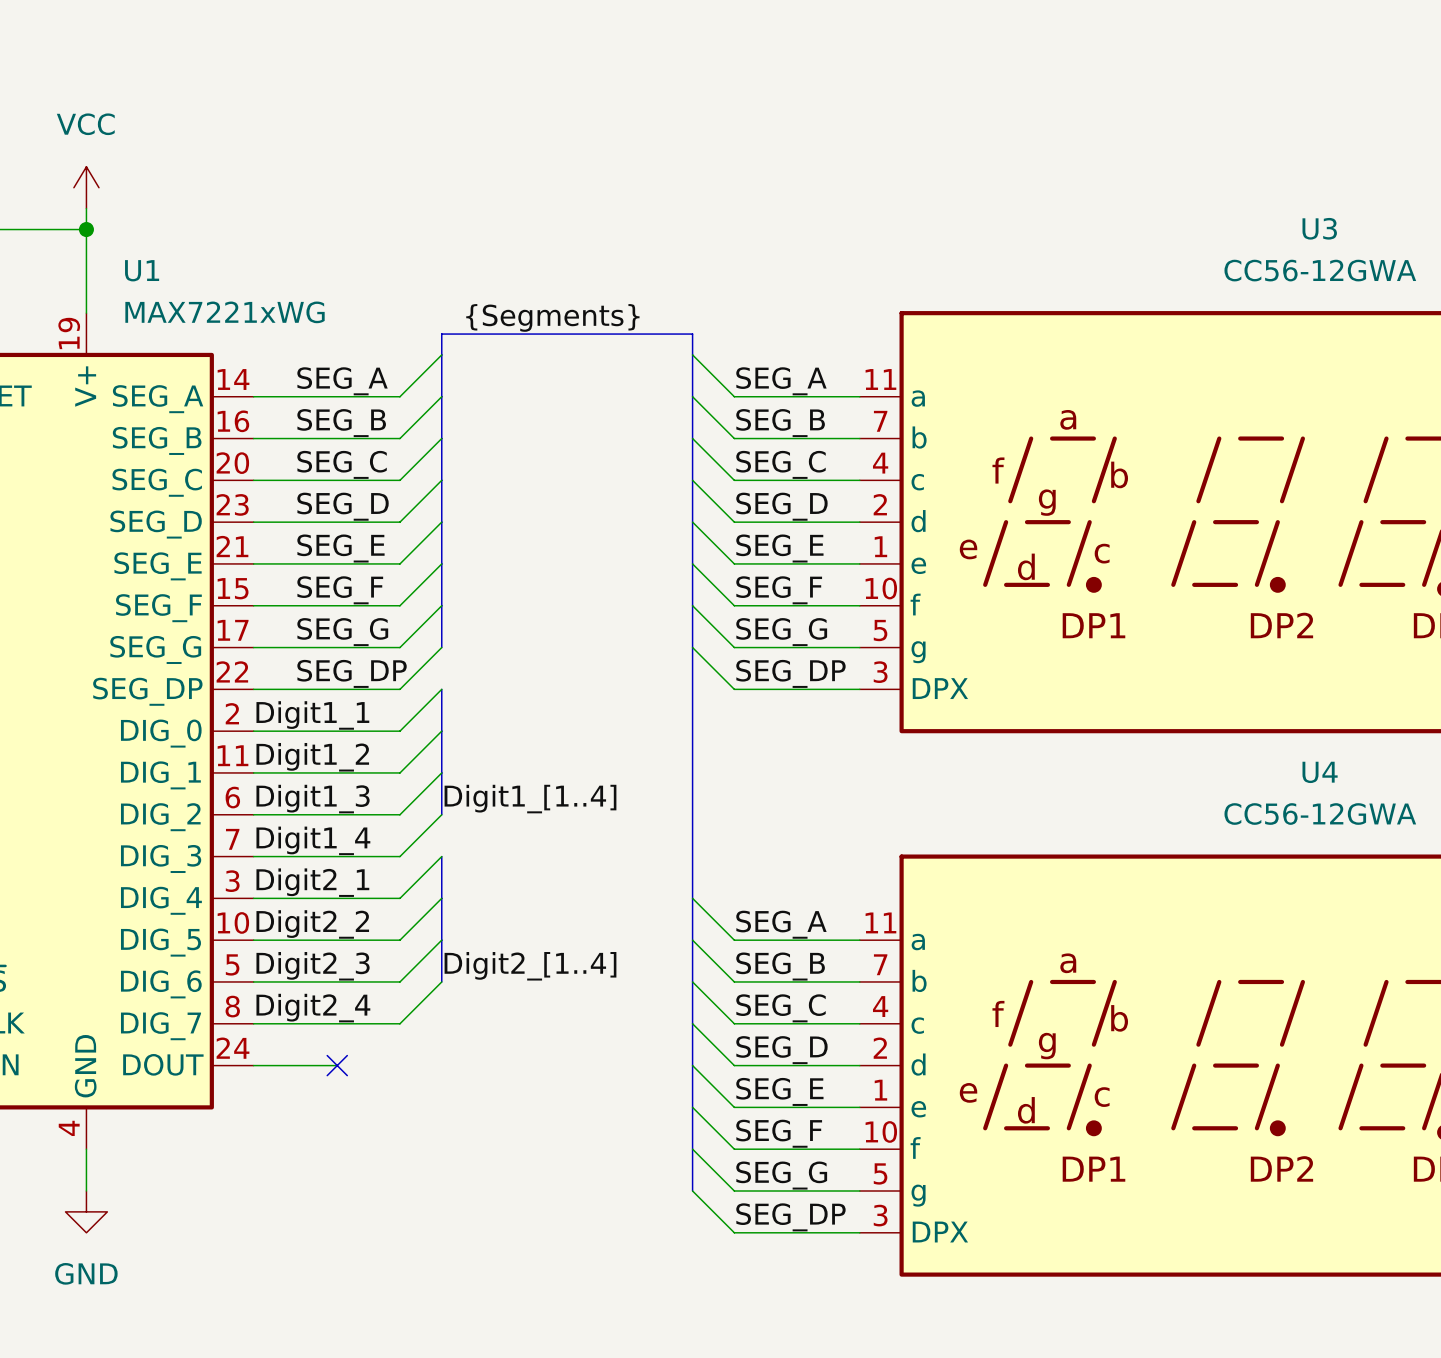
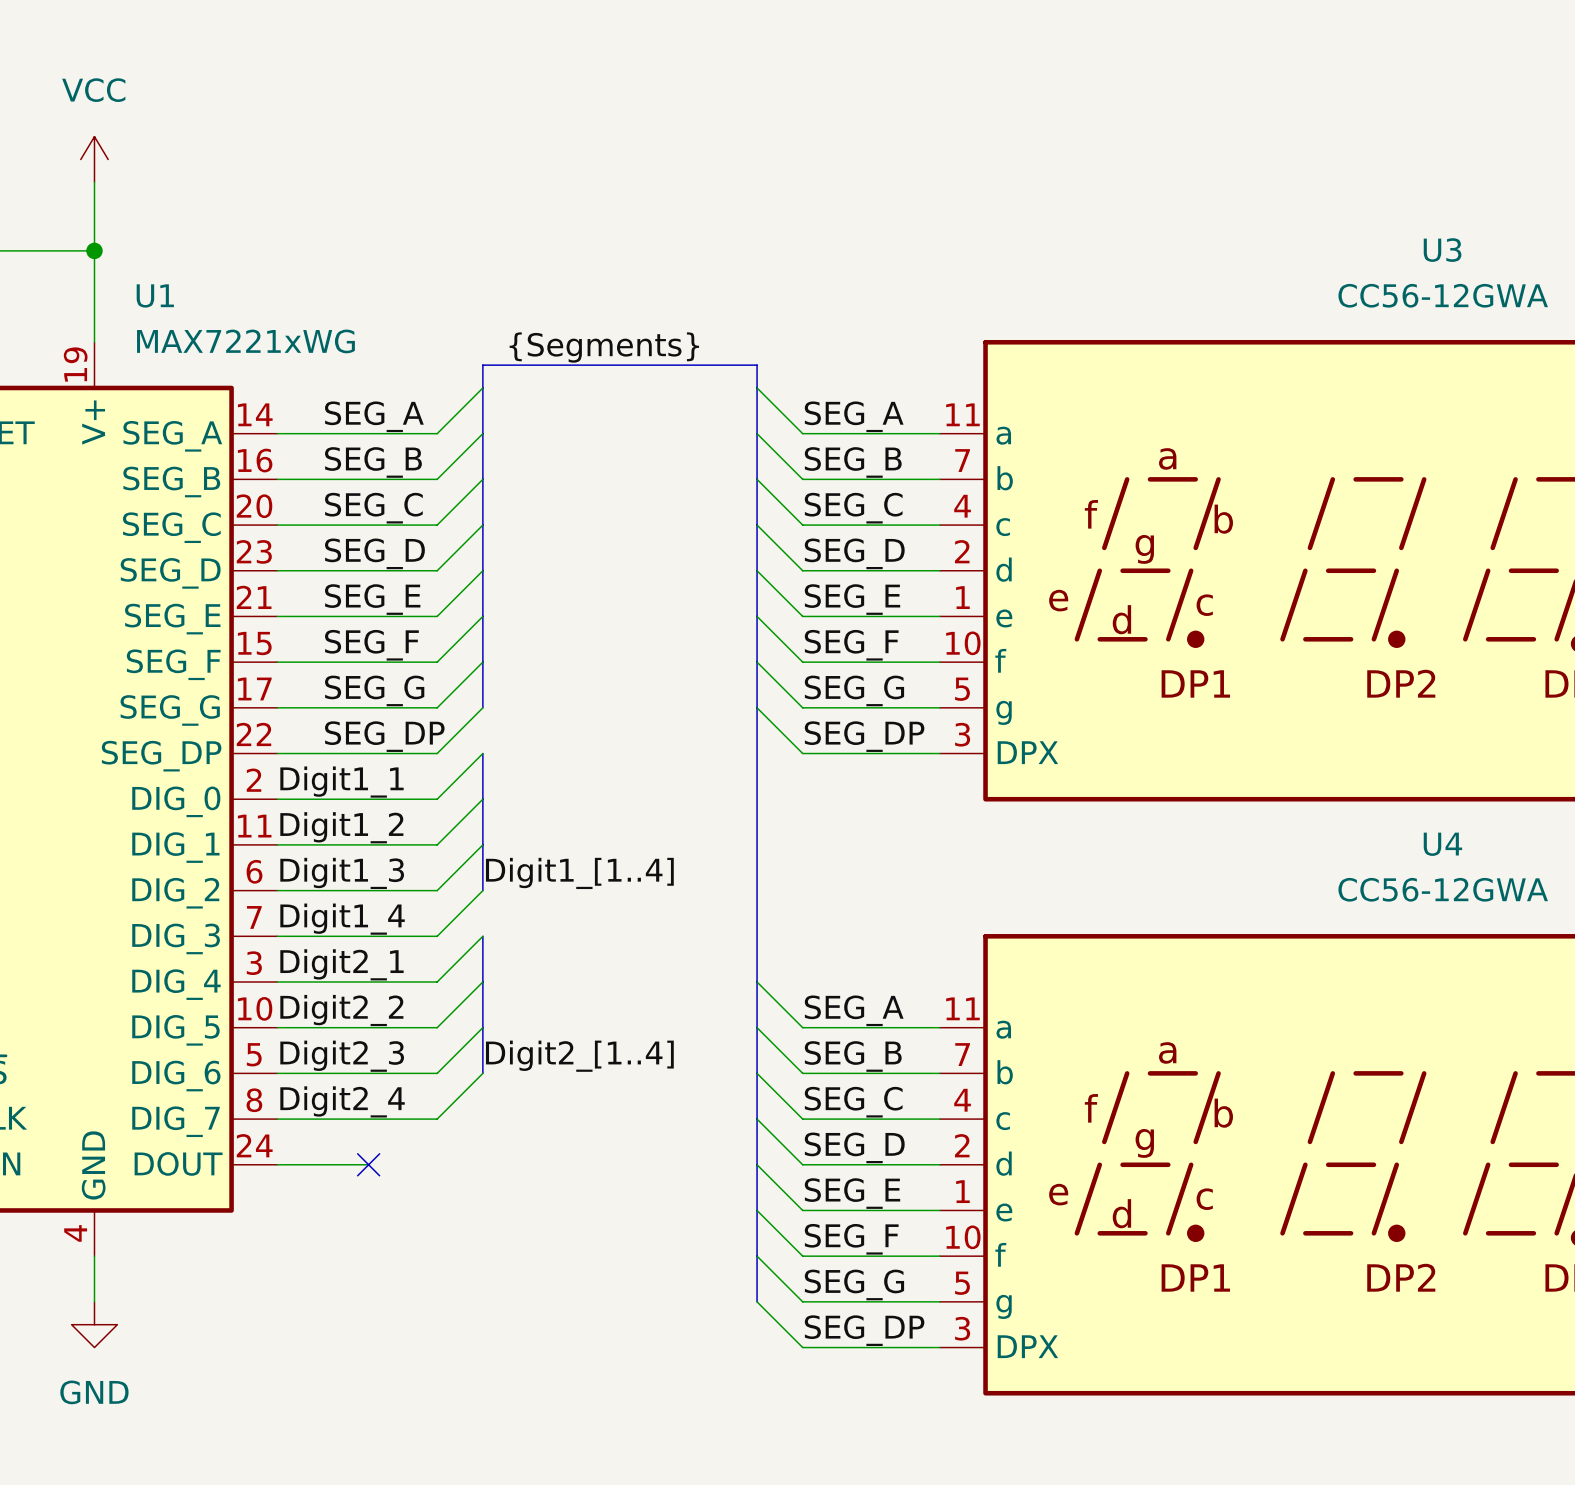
power symbol position: VCC (86, 187) -> VCC (94, 159)

